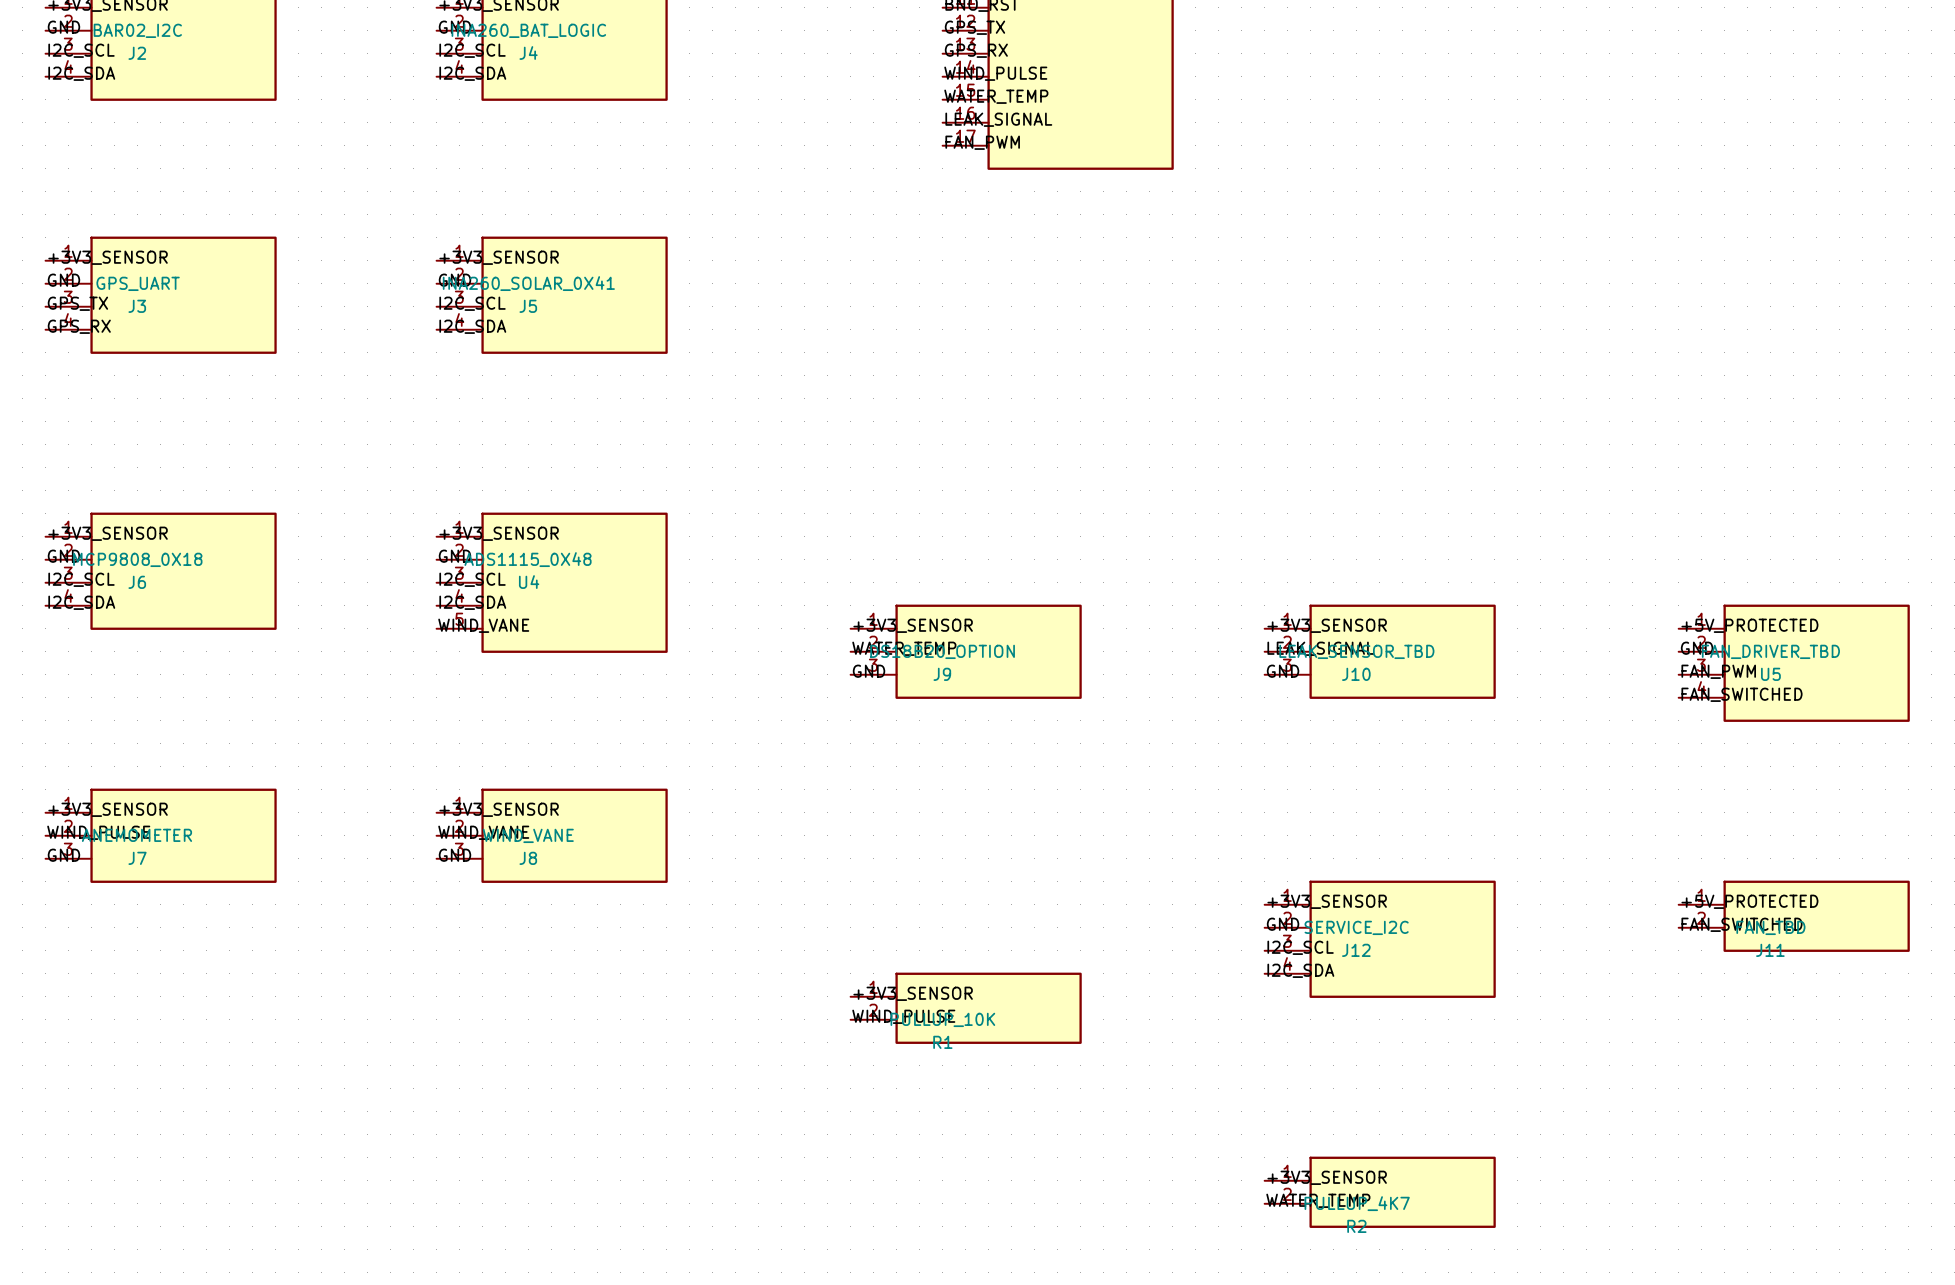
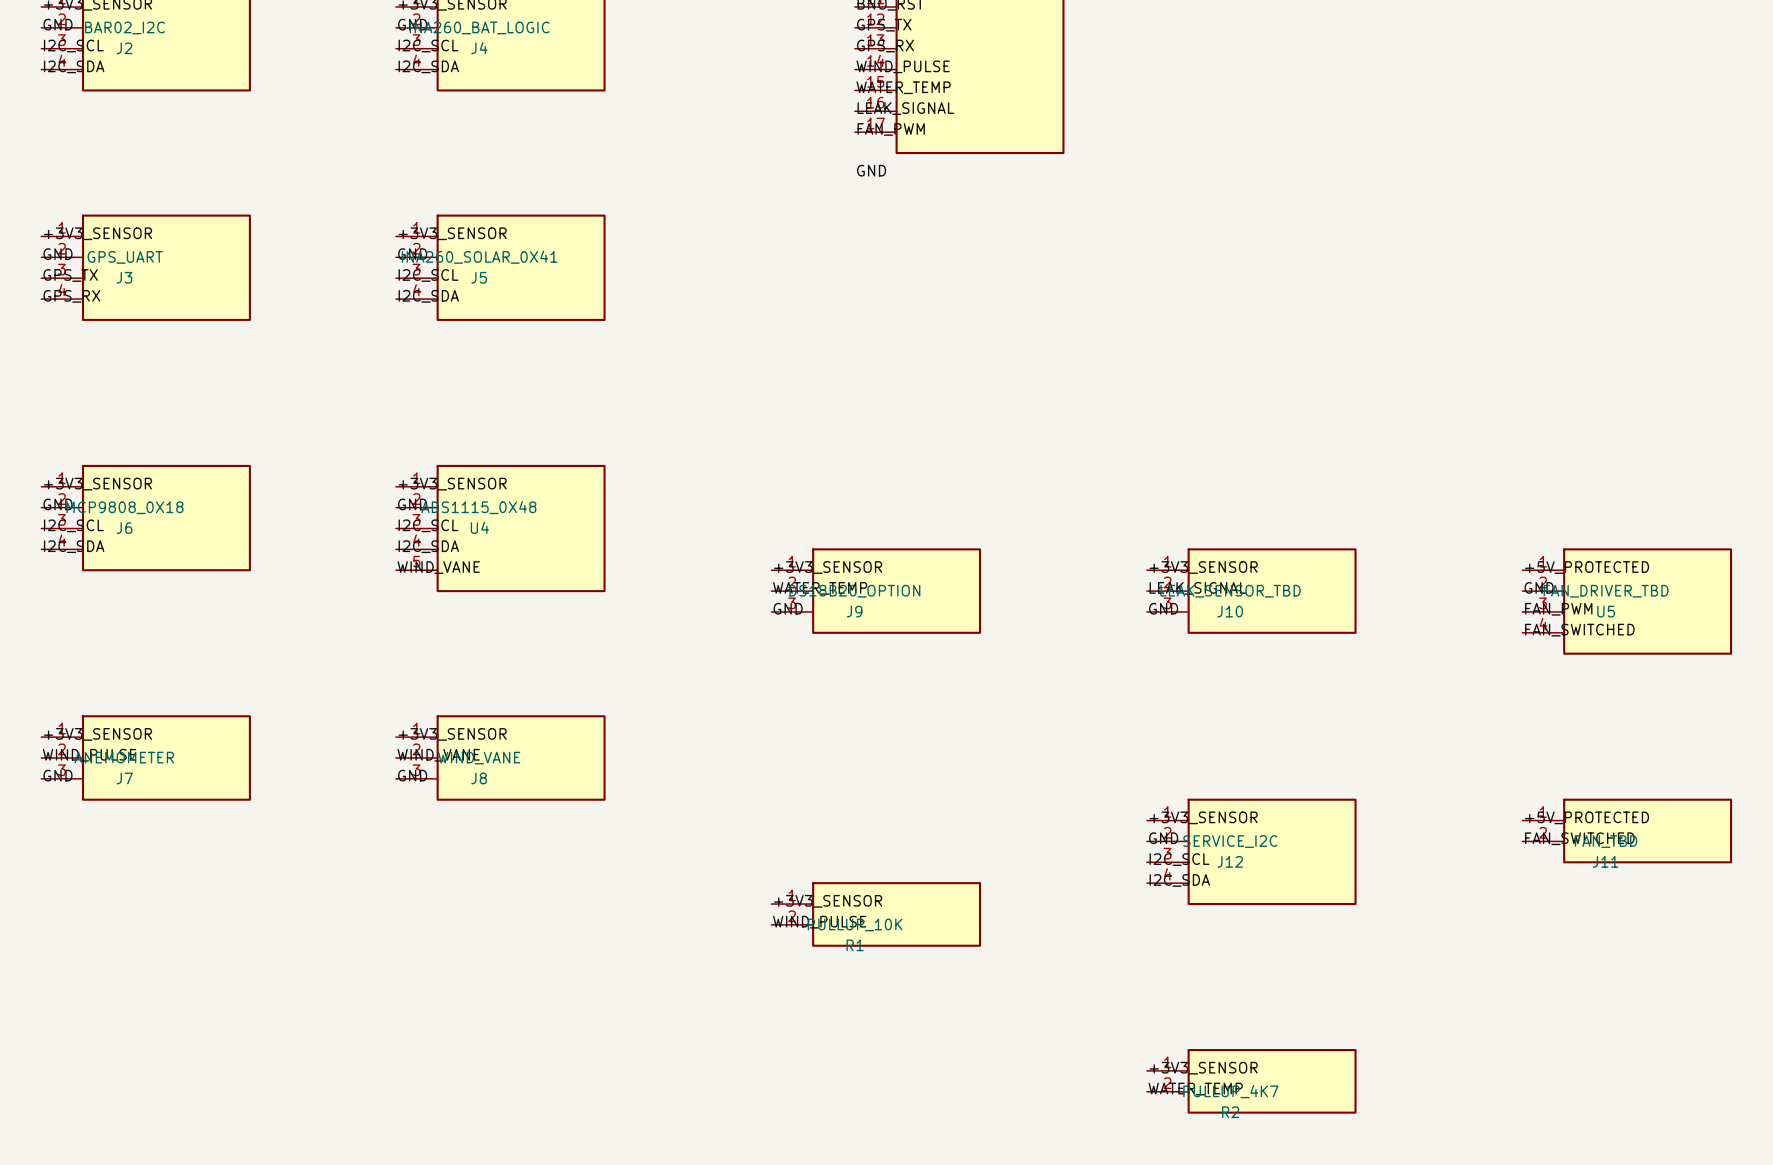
label: none -> GND (871, 170)

